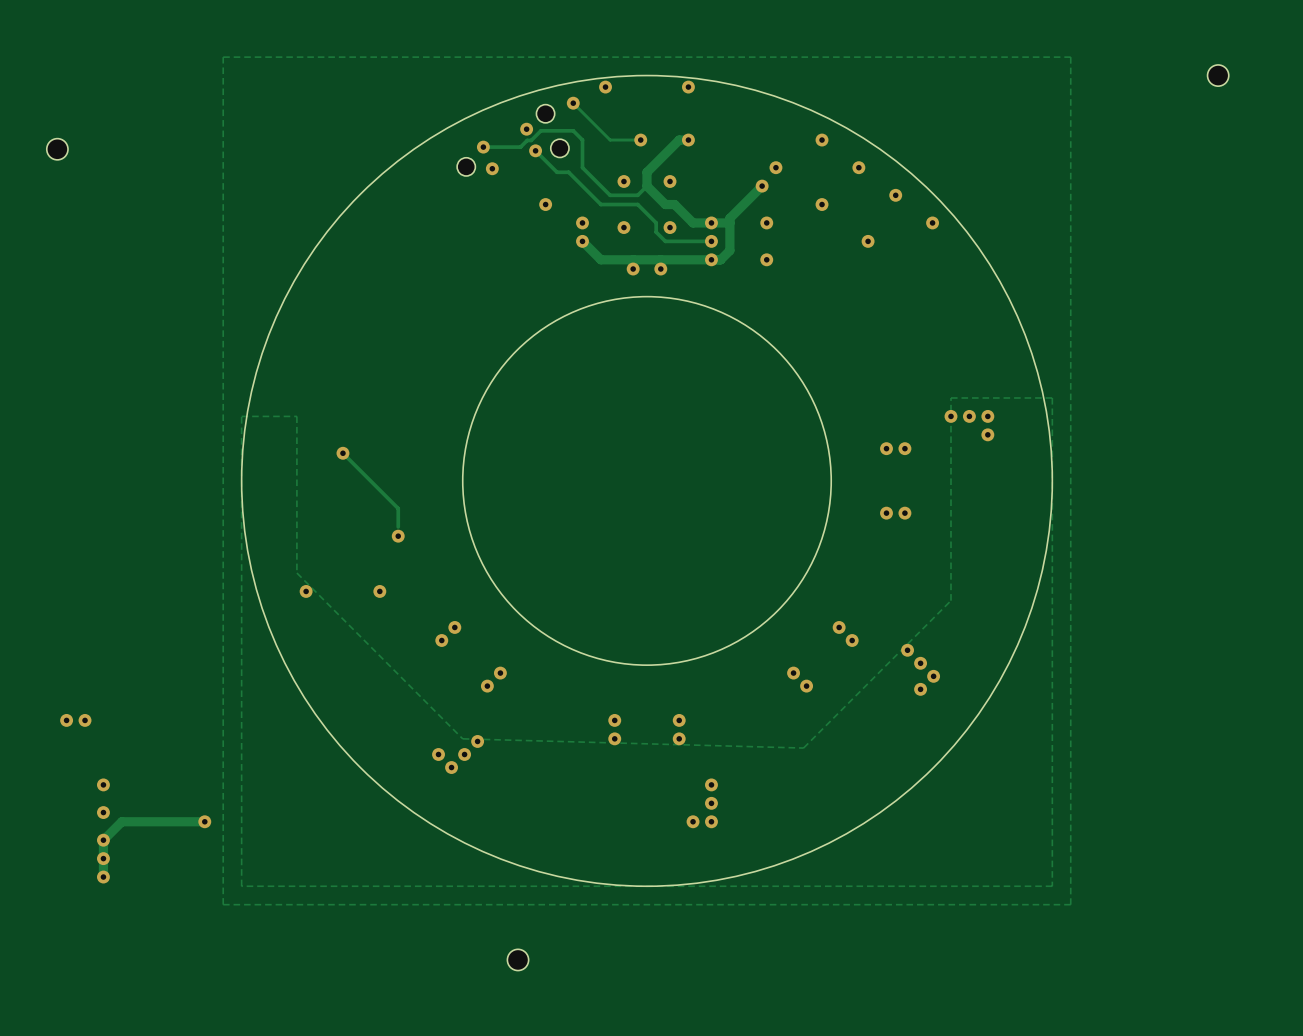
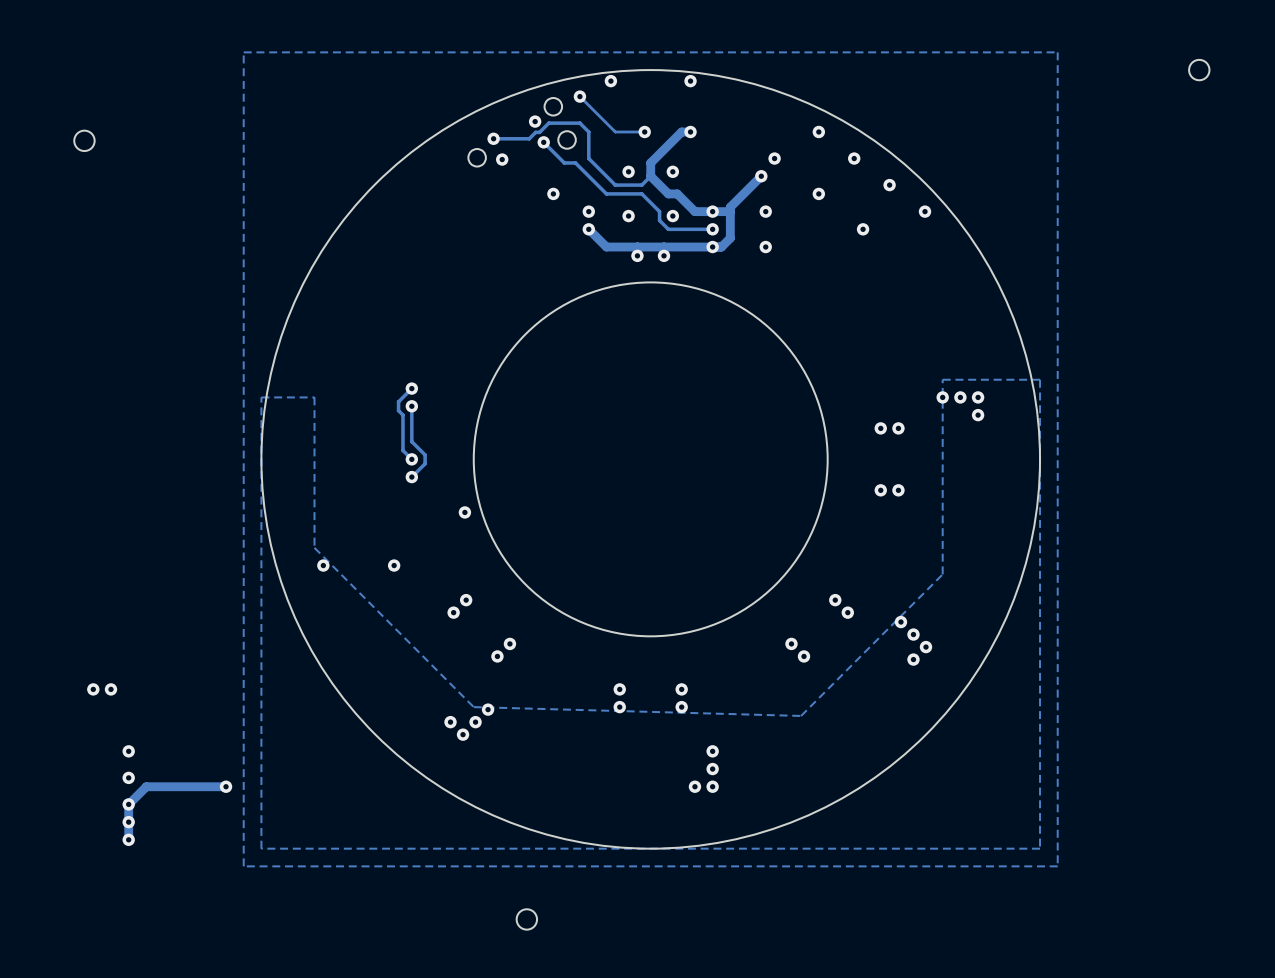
track: none -> (411, 388) (398, 401) (398, 410) (402, 415) (402, 450) (411, 459)
via: none -> (411, 388)
track: none -> (411, 406) (411, 441) (425, 454) (425, 463) (411, 477)
via: none -> (411, 406)
track: (342, 453) (398, 508) (398, 526) -> none
via: (342, 453) -> none
via: none -> (411, 459)
via: none -> (411, 477)
via: (398, 536) -> none
via: none -> (464, 512)

